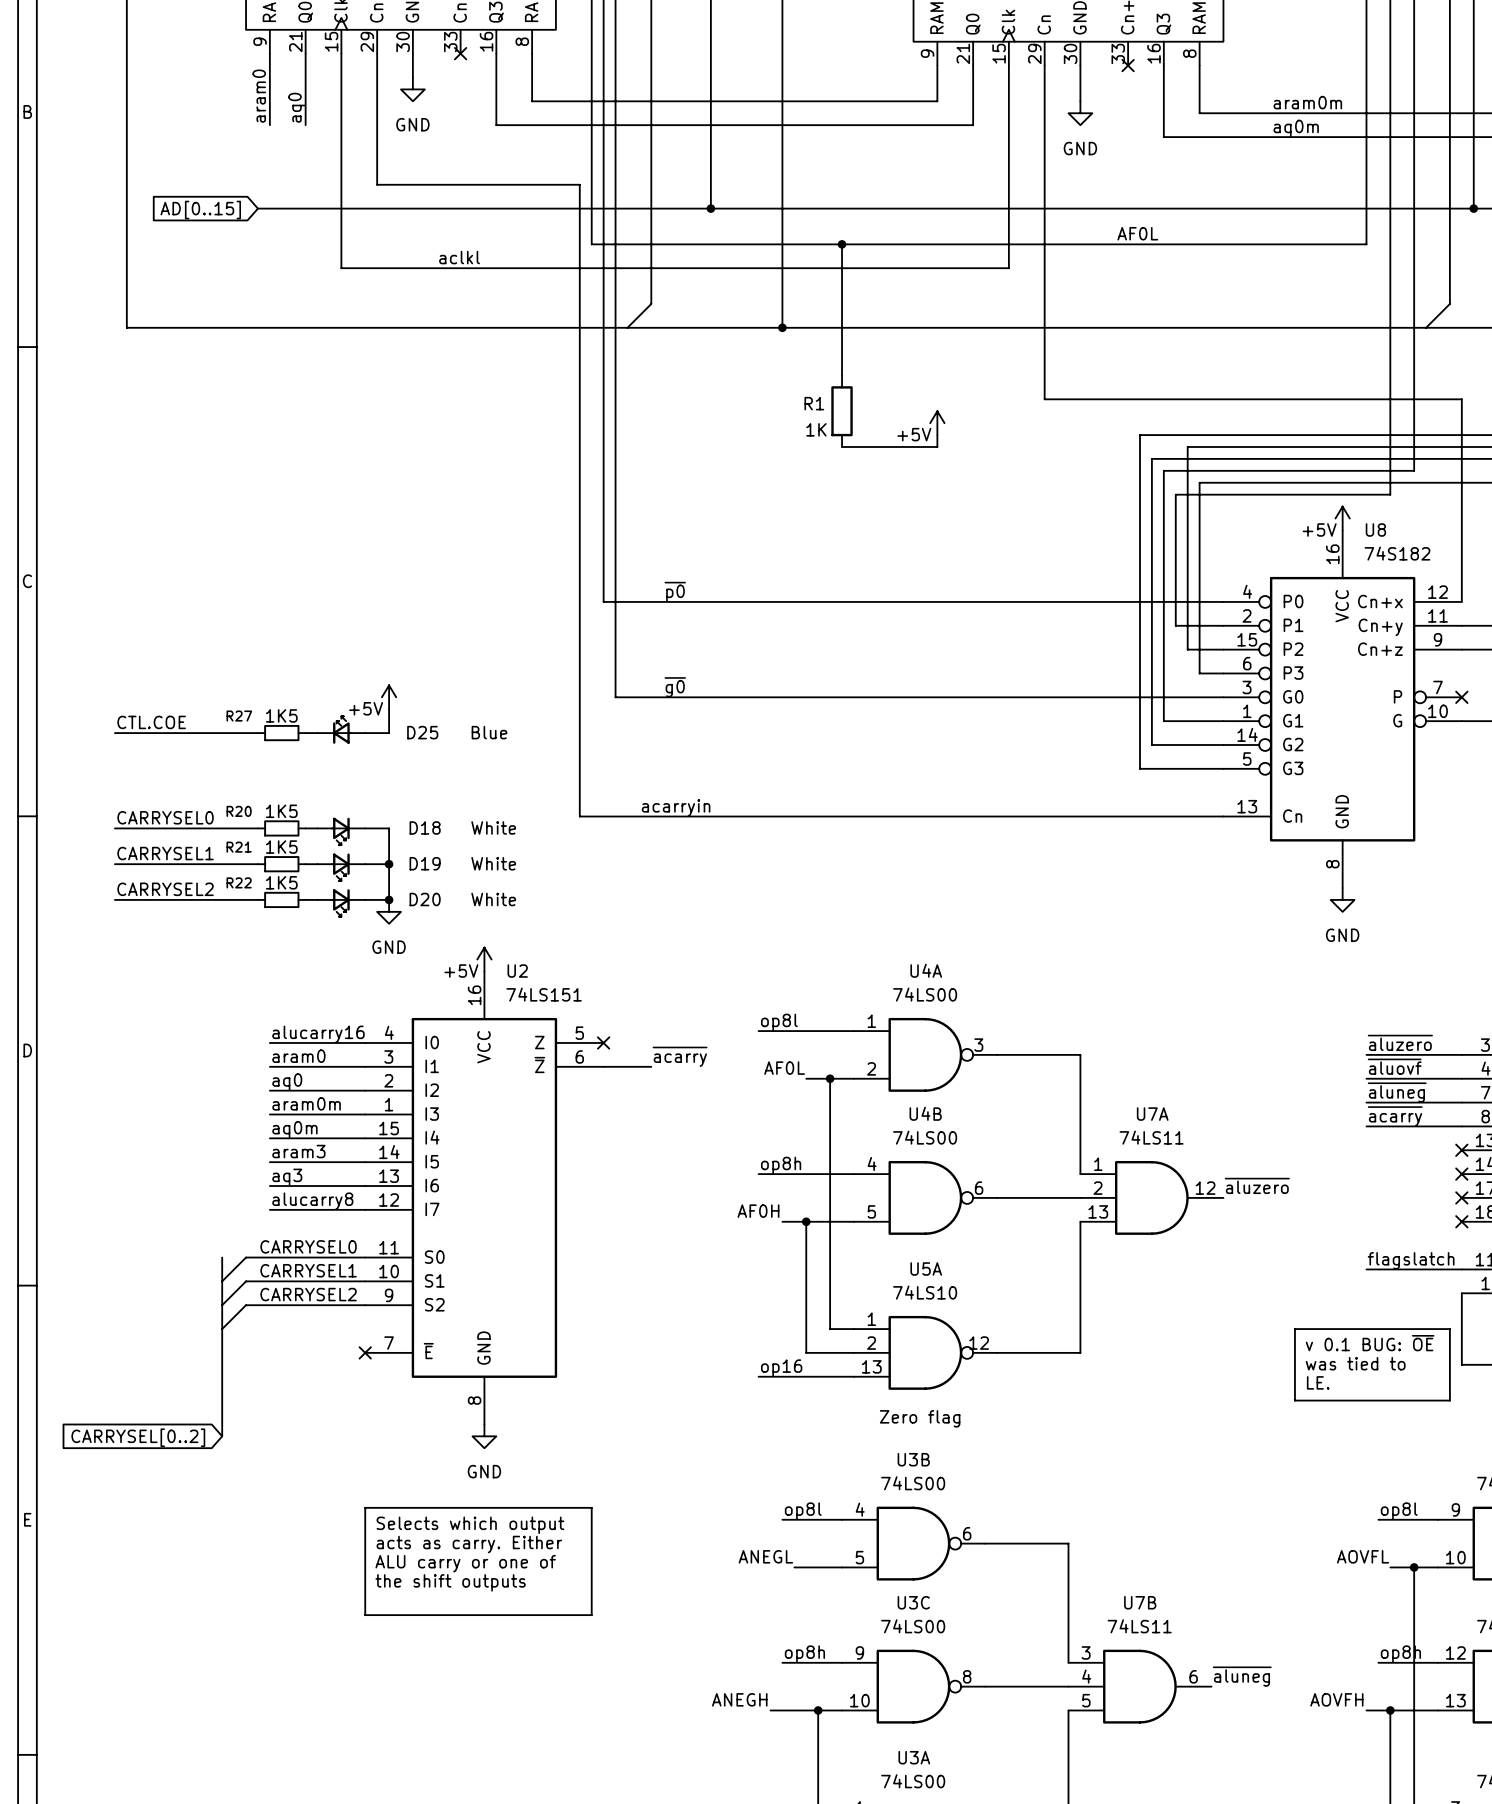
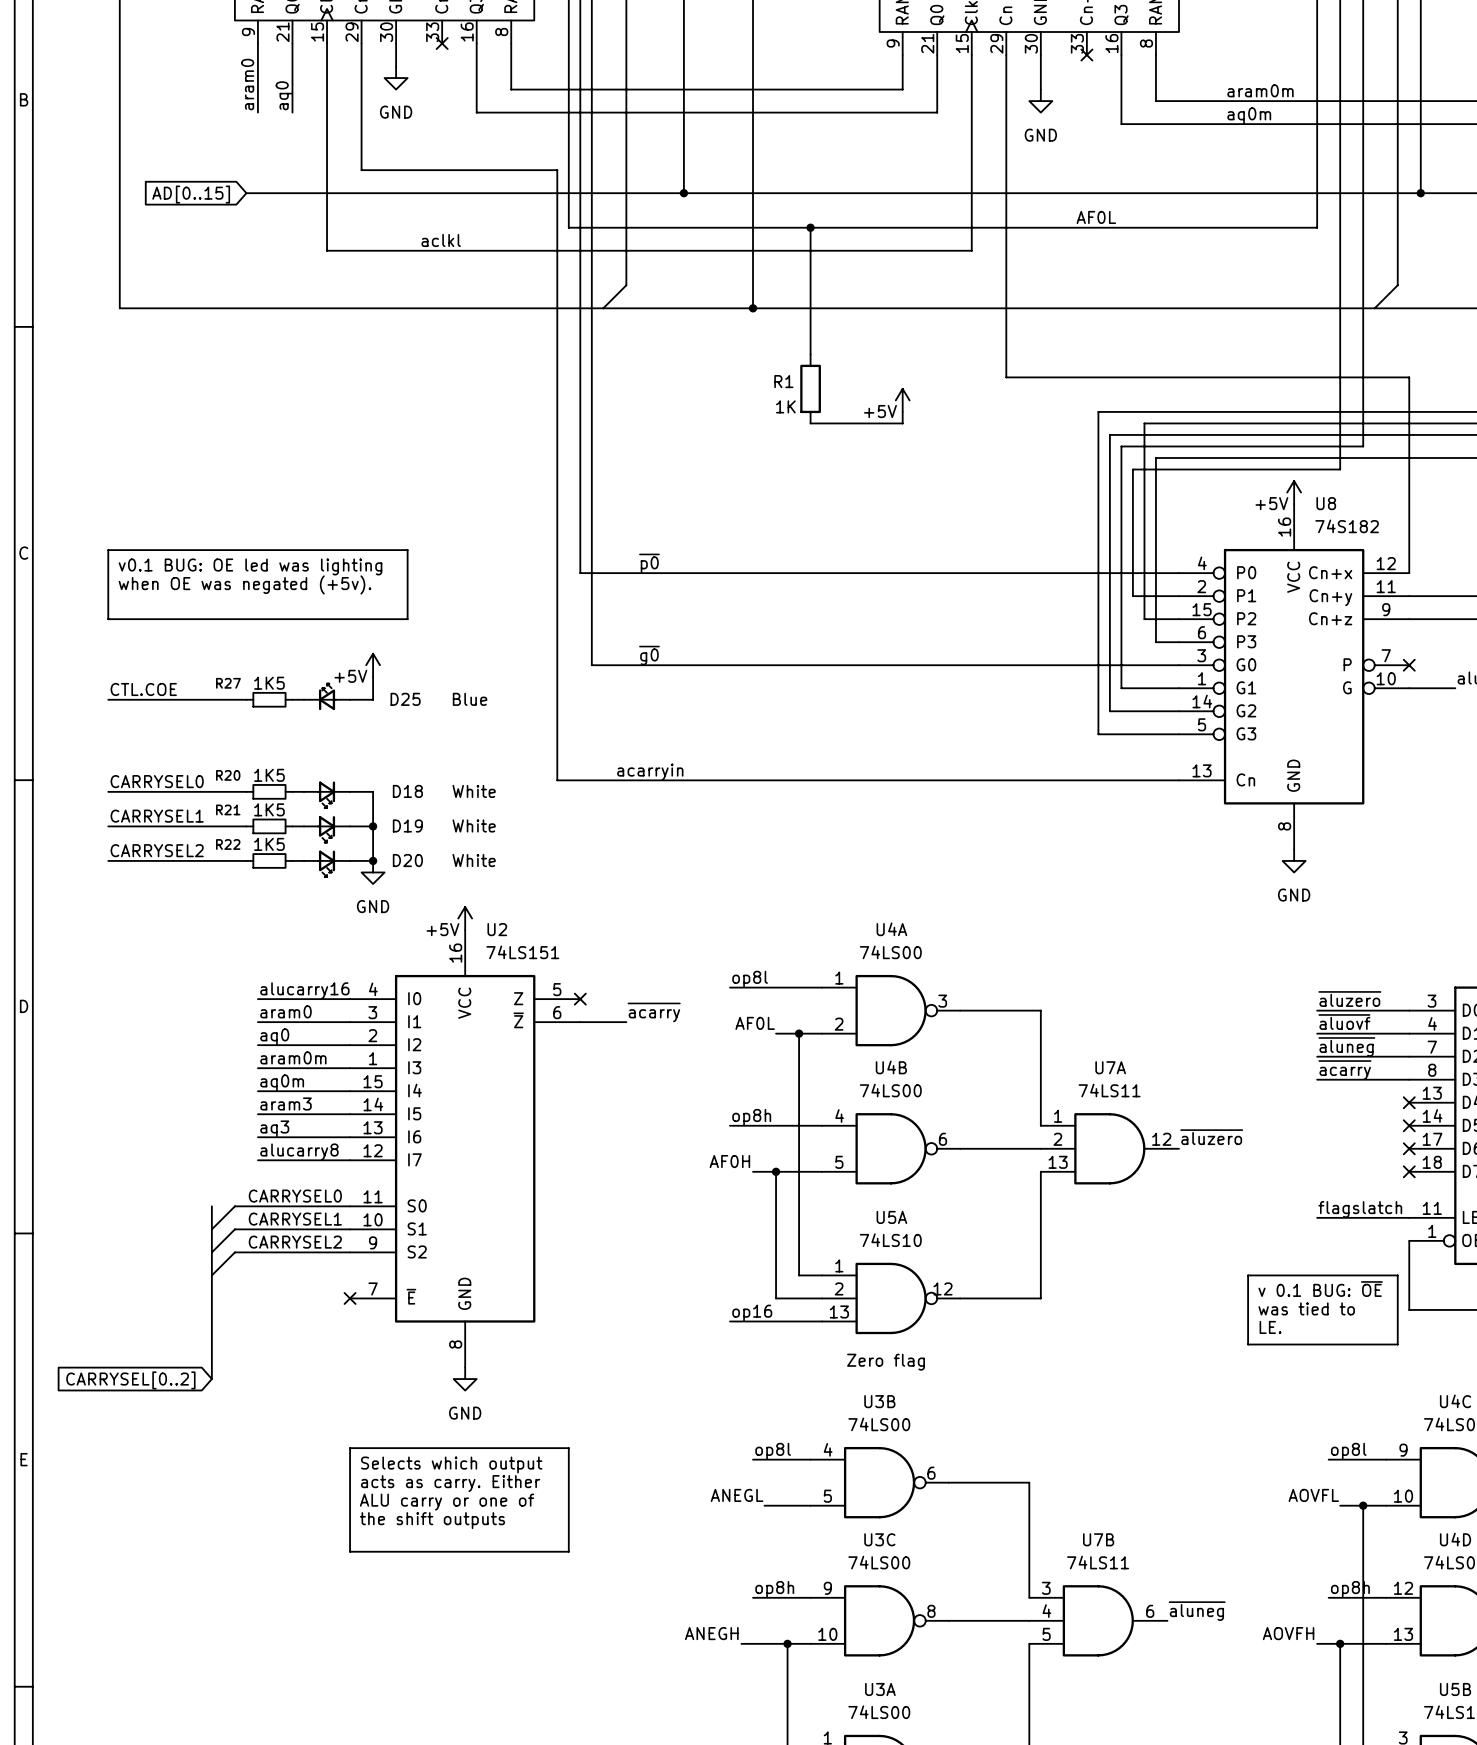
line: none -> (108, 550) (407, 550) (407, 619) (108, 619) (108, 550)
text: none -> v0.1 BUG: OE led was lighting (250, 566)
text: none -> when OE was negated (+5v). (245, 584)

